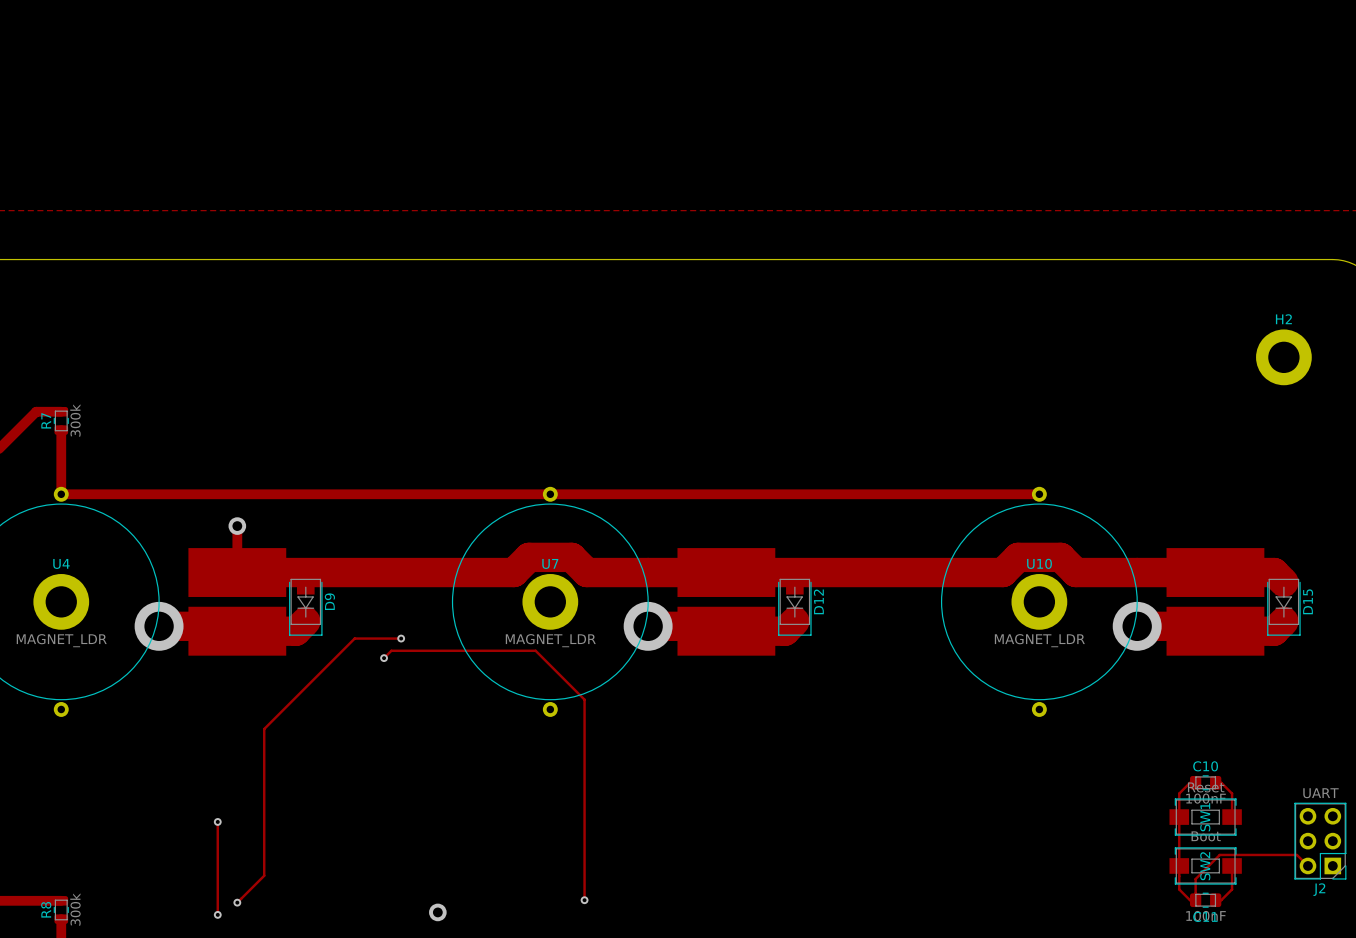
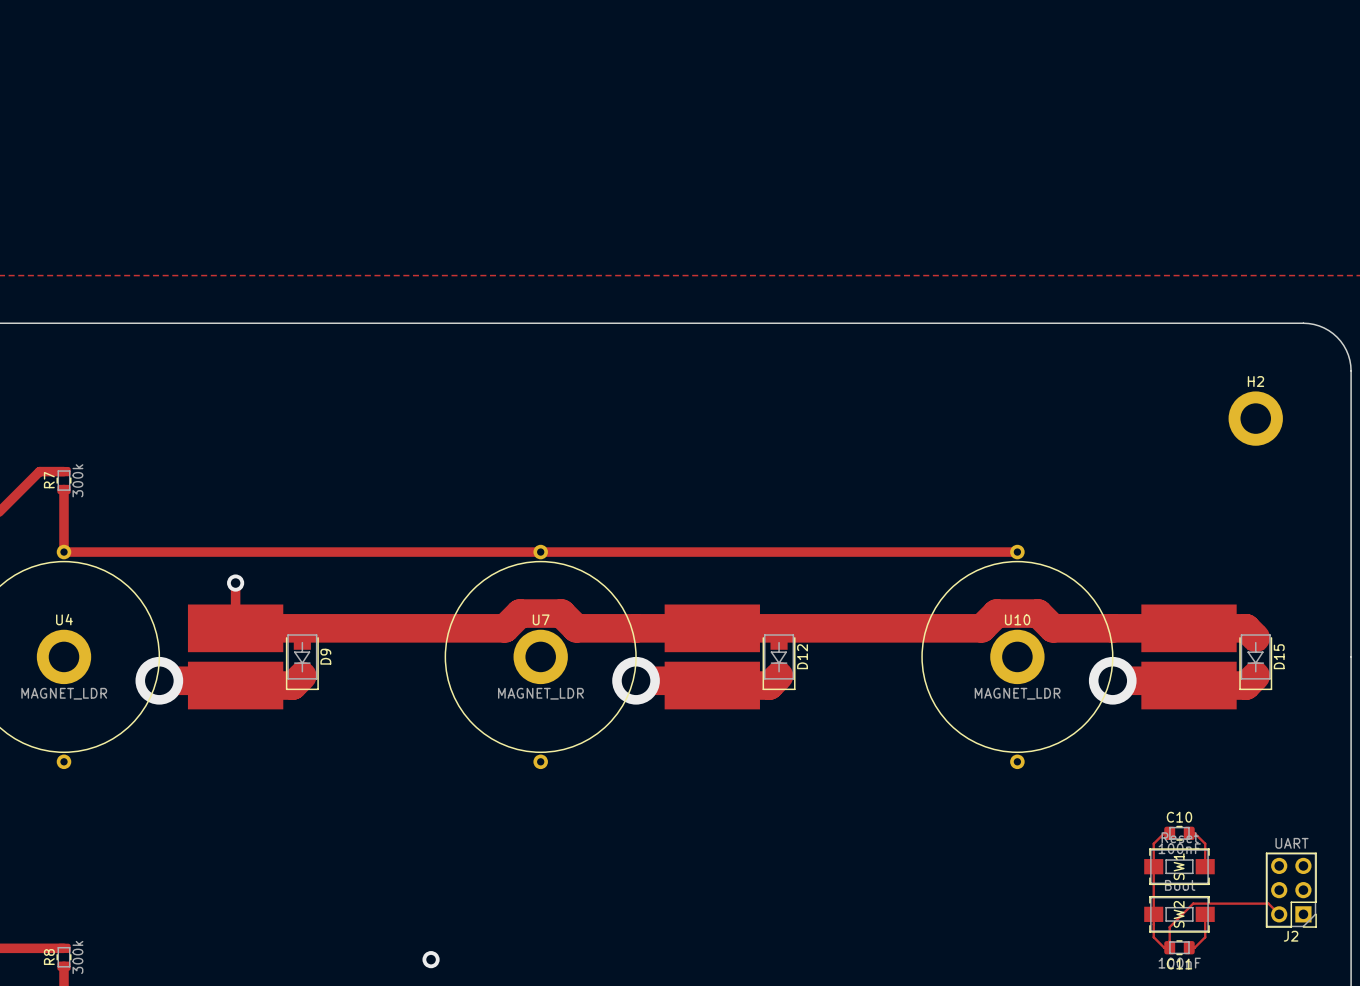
track: (401, 638) (354, 638) (264, 729) (264, 875) (237, 902) -> none
via: (401, 638) -> none
track: (384, 658) (391, 650) (535, 650) (584, 699) (584, 900) -> none
via: (384, 658) -> none
track: (217, 821) (217, 914) -> none
via: (217, 821) -> none
via: (584, 900) -> none
via: (237, 902) -> none
via: (217, 914) -> none

